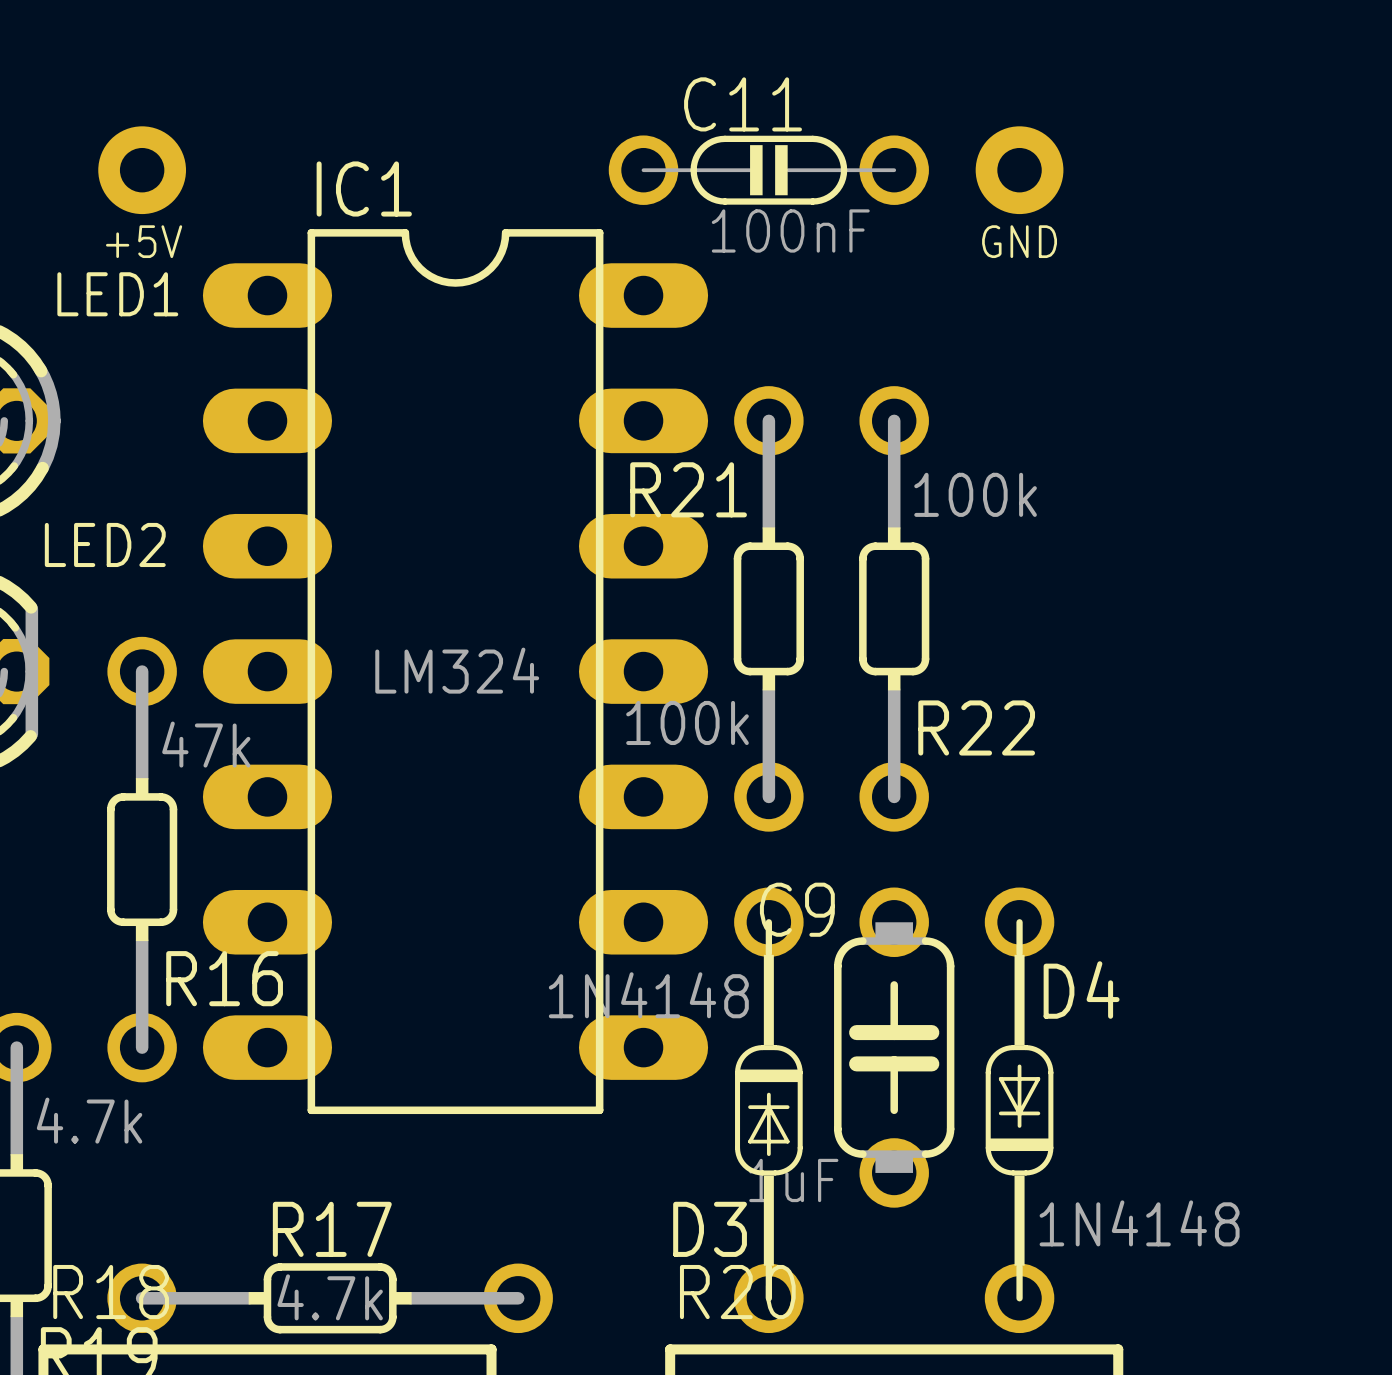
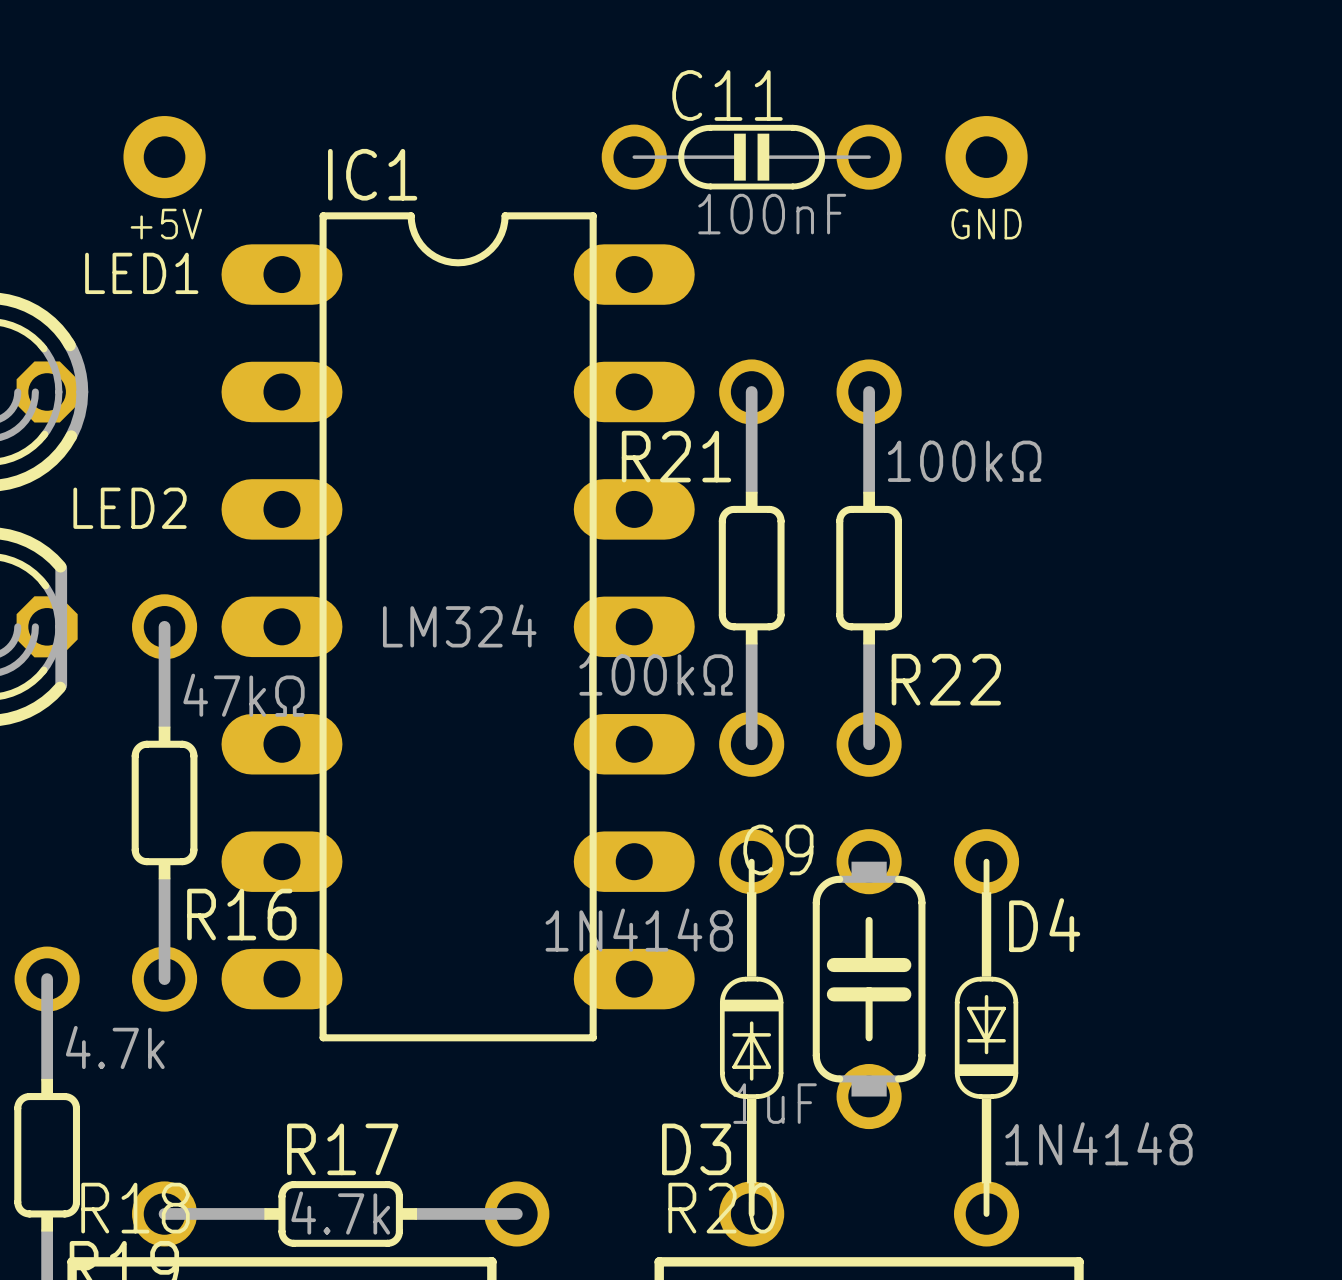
R22 value: 100k (975, 494) -> 100kΩ (964, 461)
R21 value: 100k (687, 722) -> 100kΩ (656, 674)
R16 value: 47k (206, 744) -> 47kΩ (243, 695)

